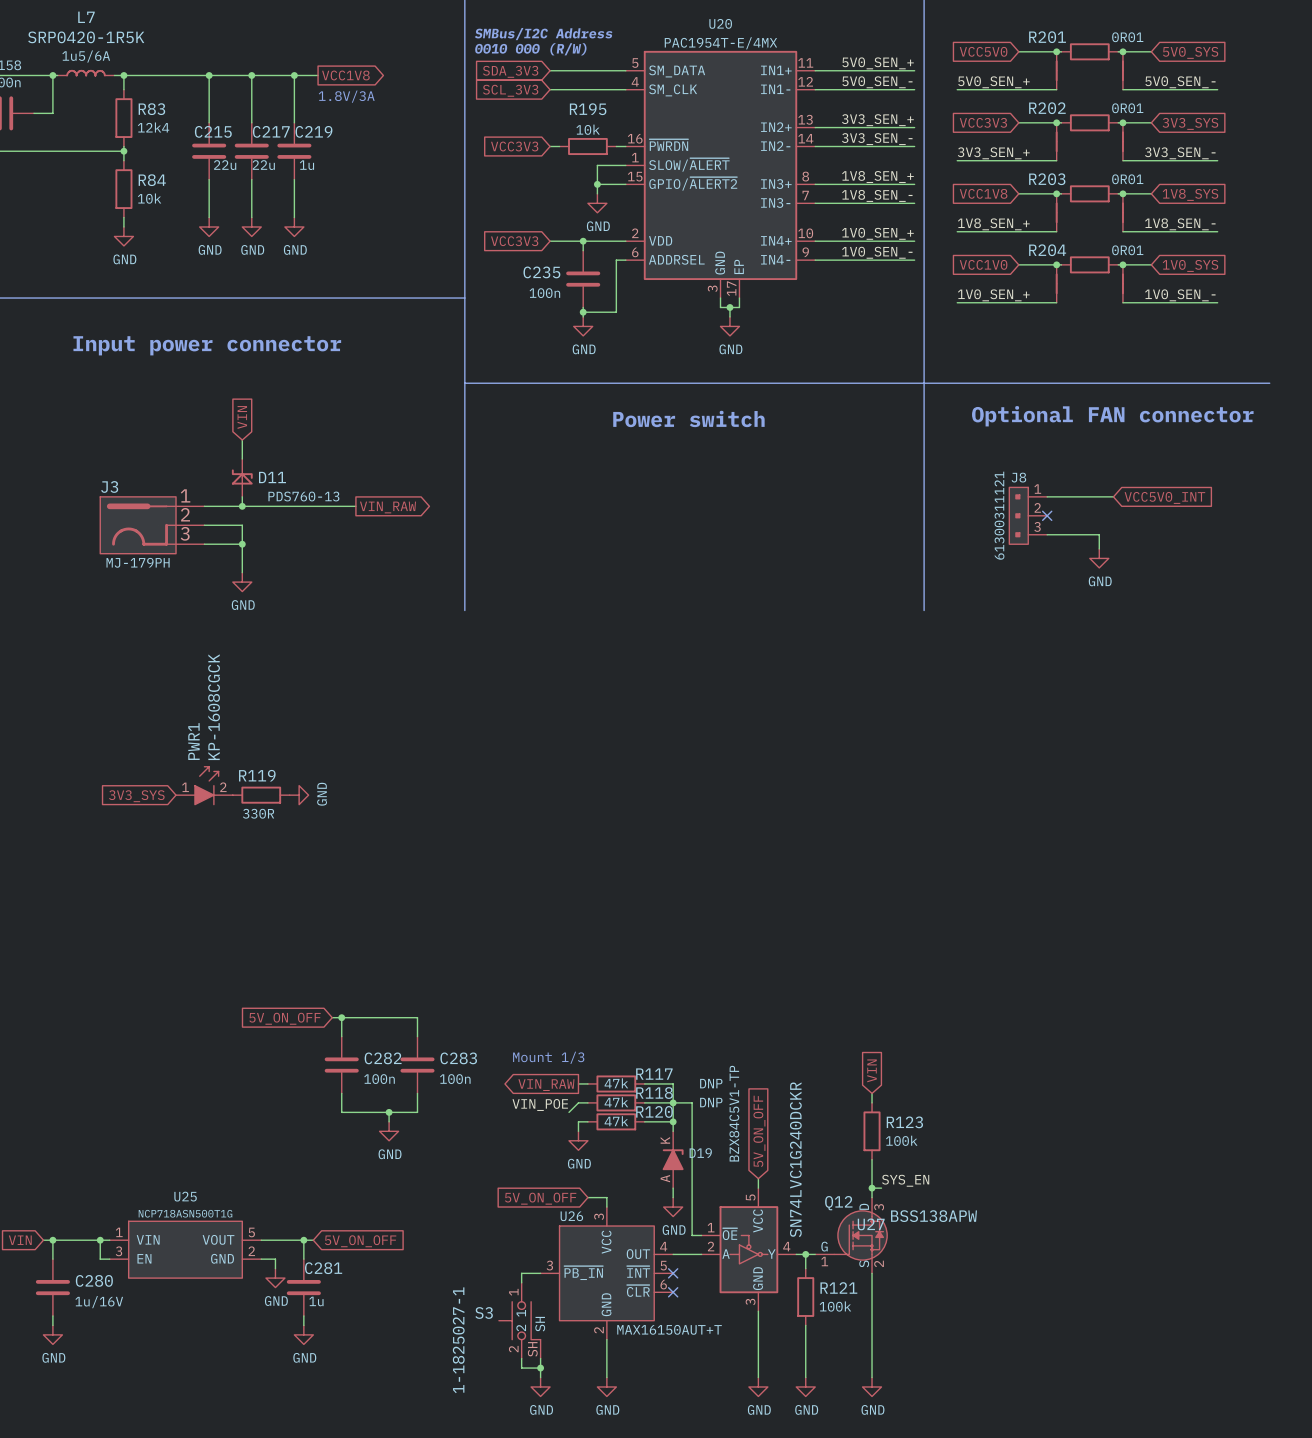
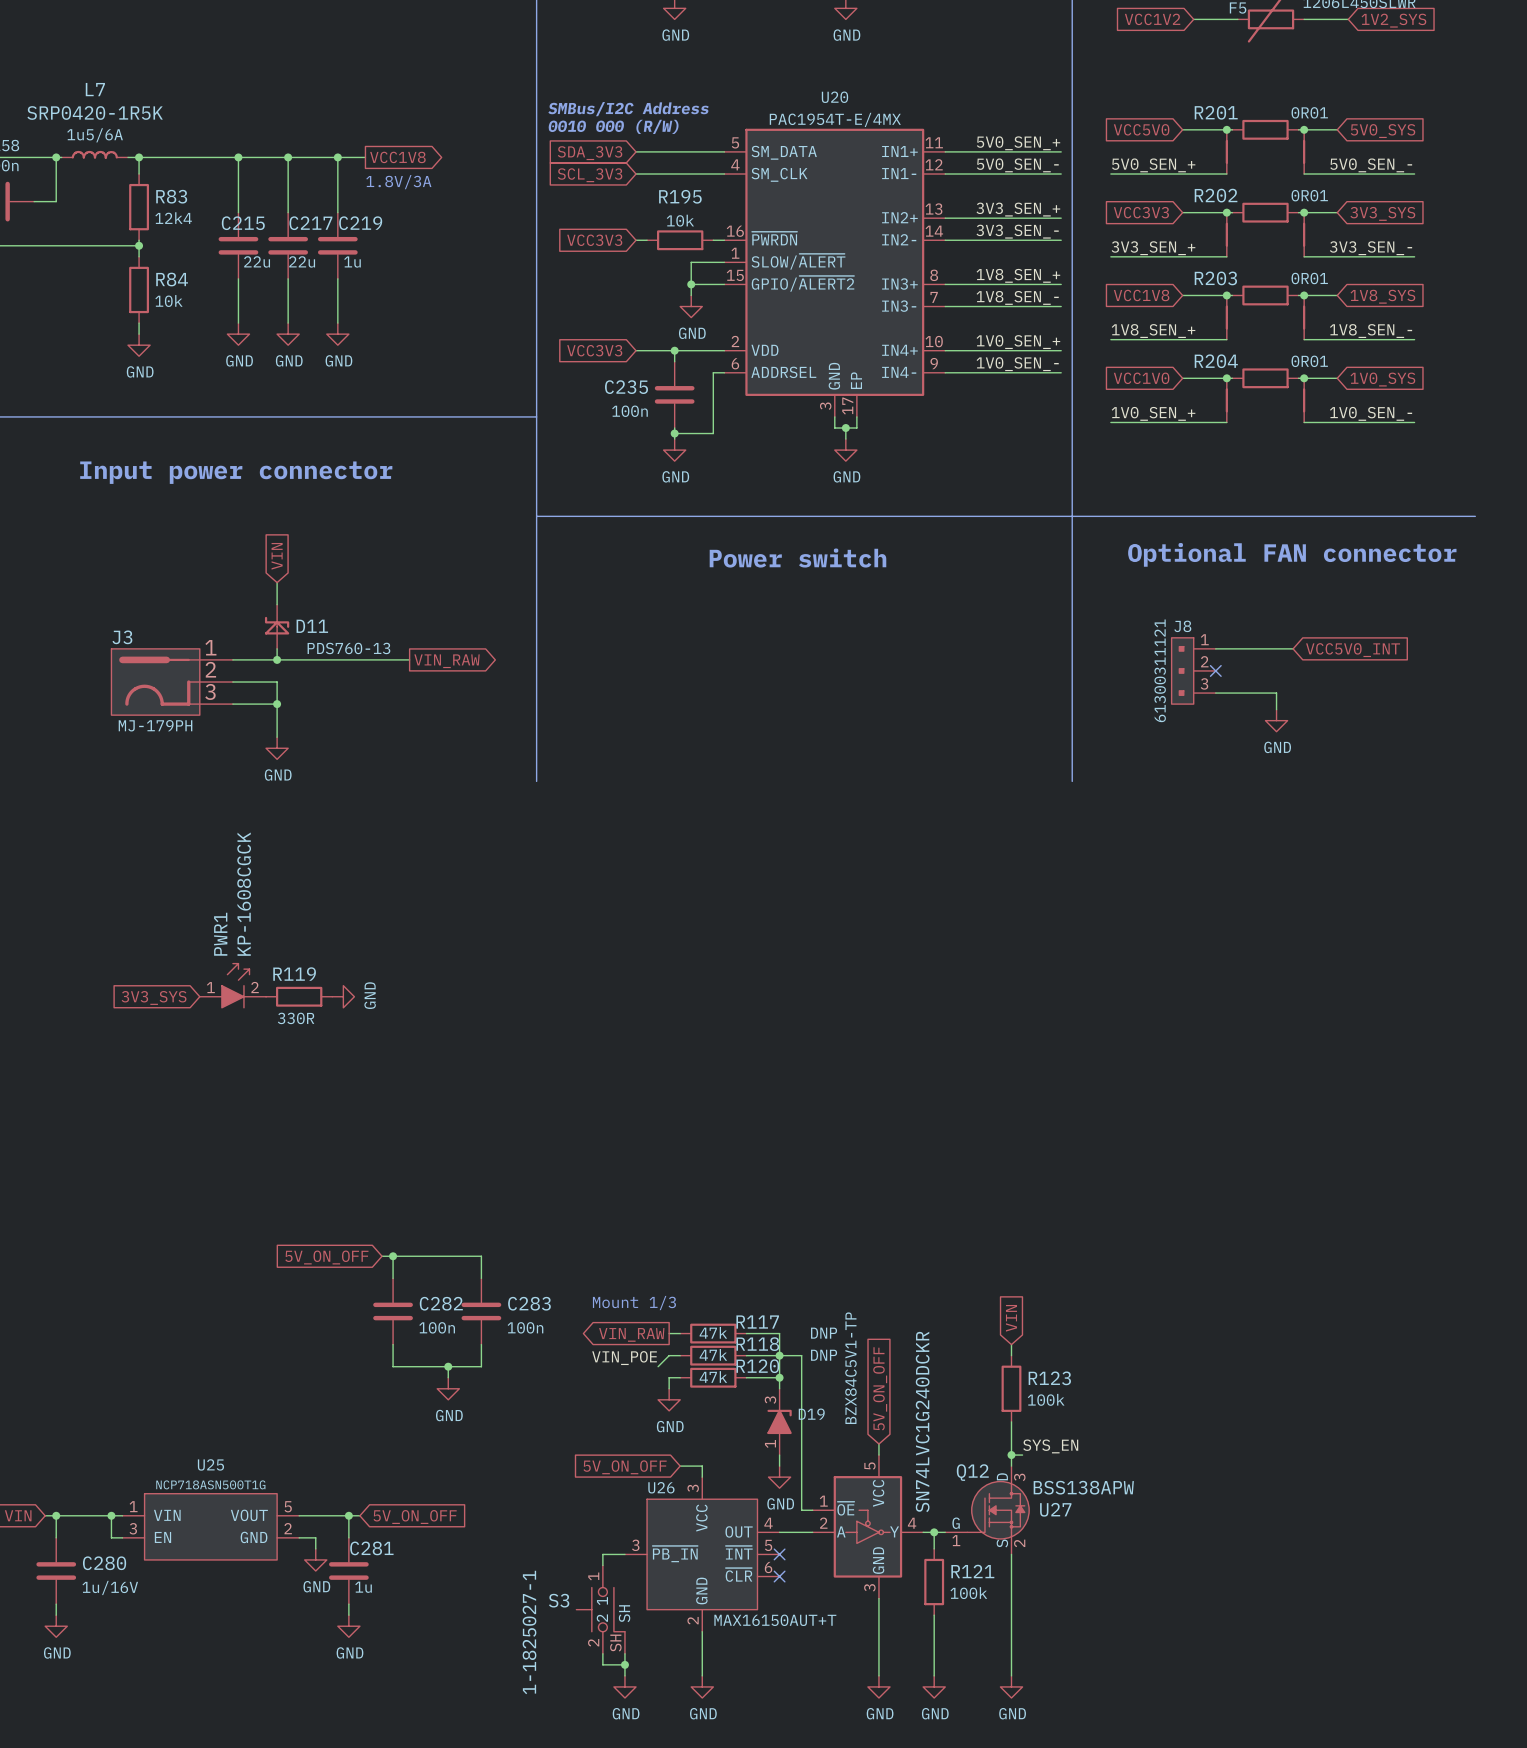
D19 pin number: K (665, 1140) -> 3 (770, 1400)
D19 pin number: A (665, 1178) -> 1 (770, 1443)
U27 name position: U27 (871, 1224) -> U27 (1055, 1509)

